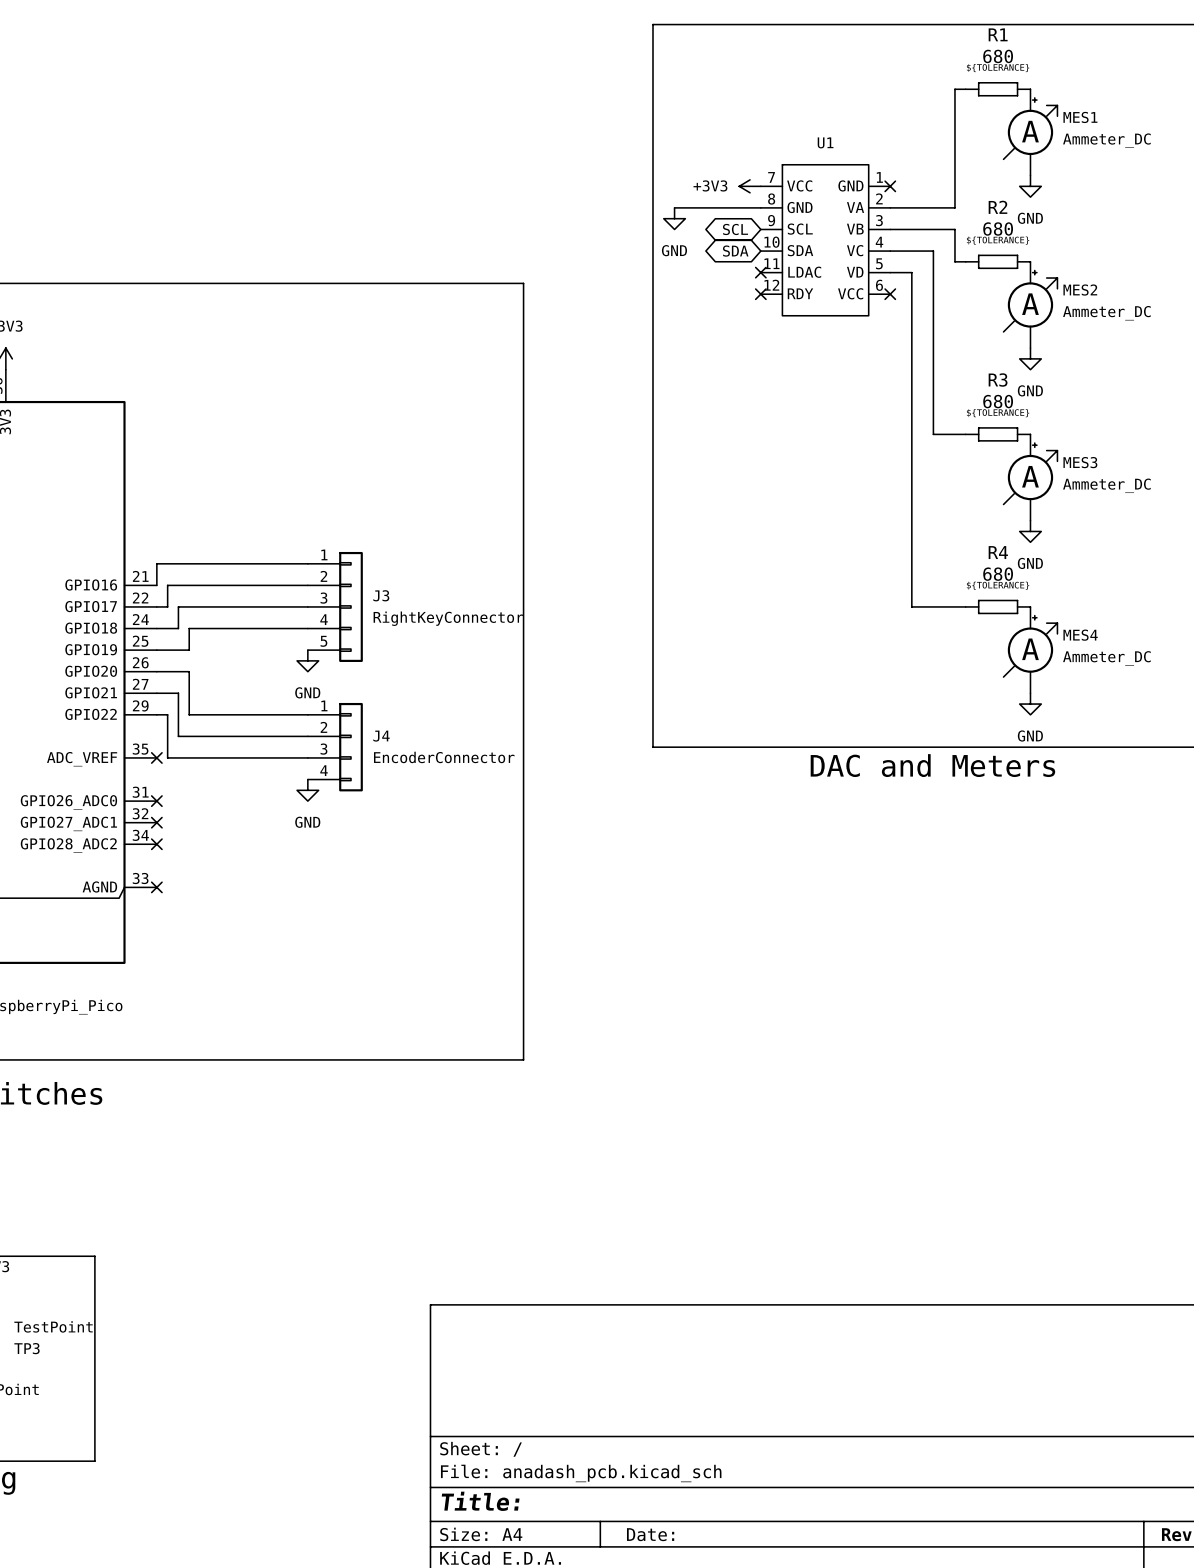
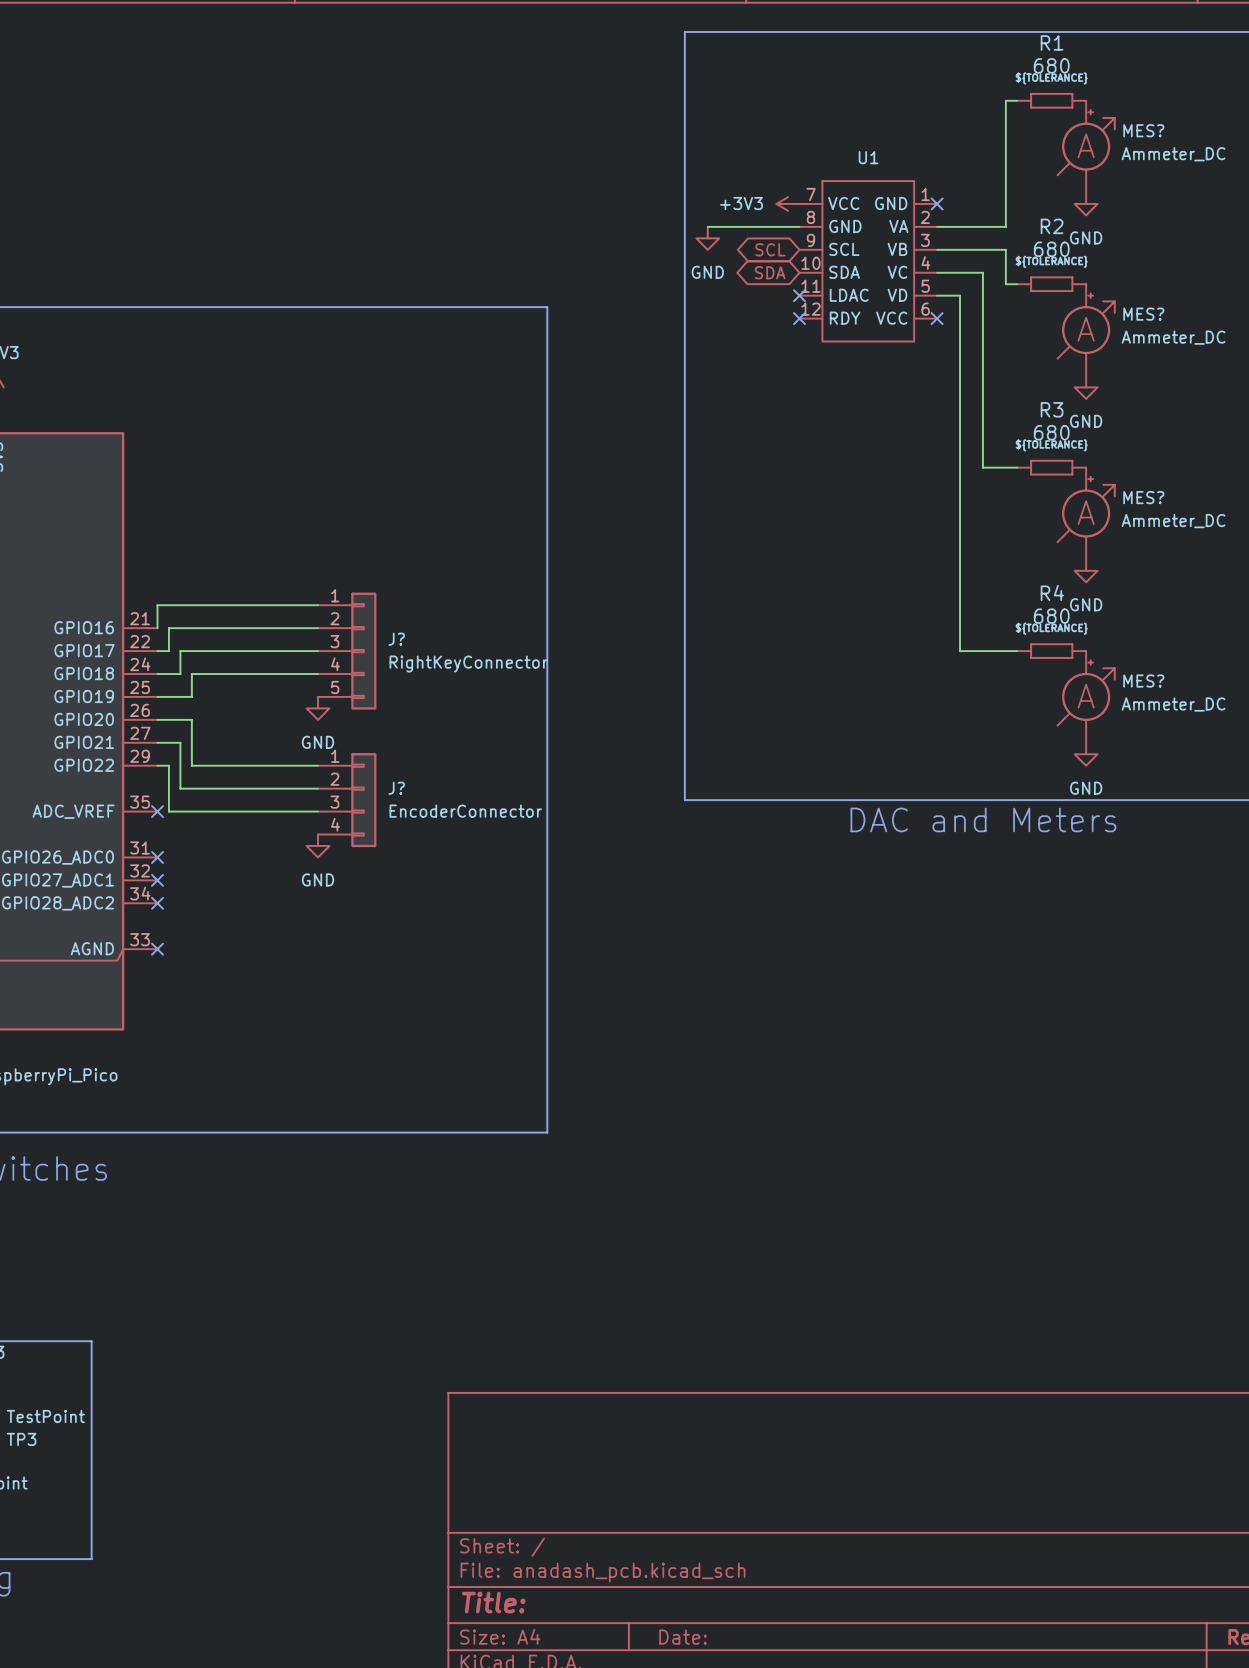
MES1 name: MES1 (1080, 117) -> MES? (1143, 130)
MES2 name: MES2 (1080, 290) -> MES? (1143, 314)
MES3 name: MES3 (1080, 462) -> MES? (1143, 497)
J3 name: J3 (381, 595) -> J? (396, 639)
MES4 name: MES4 (1080, 635) -> MES? (1143, 681)
J4 name: J4 (381, 736) -> J? (396, 788)

